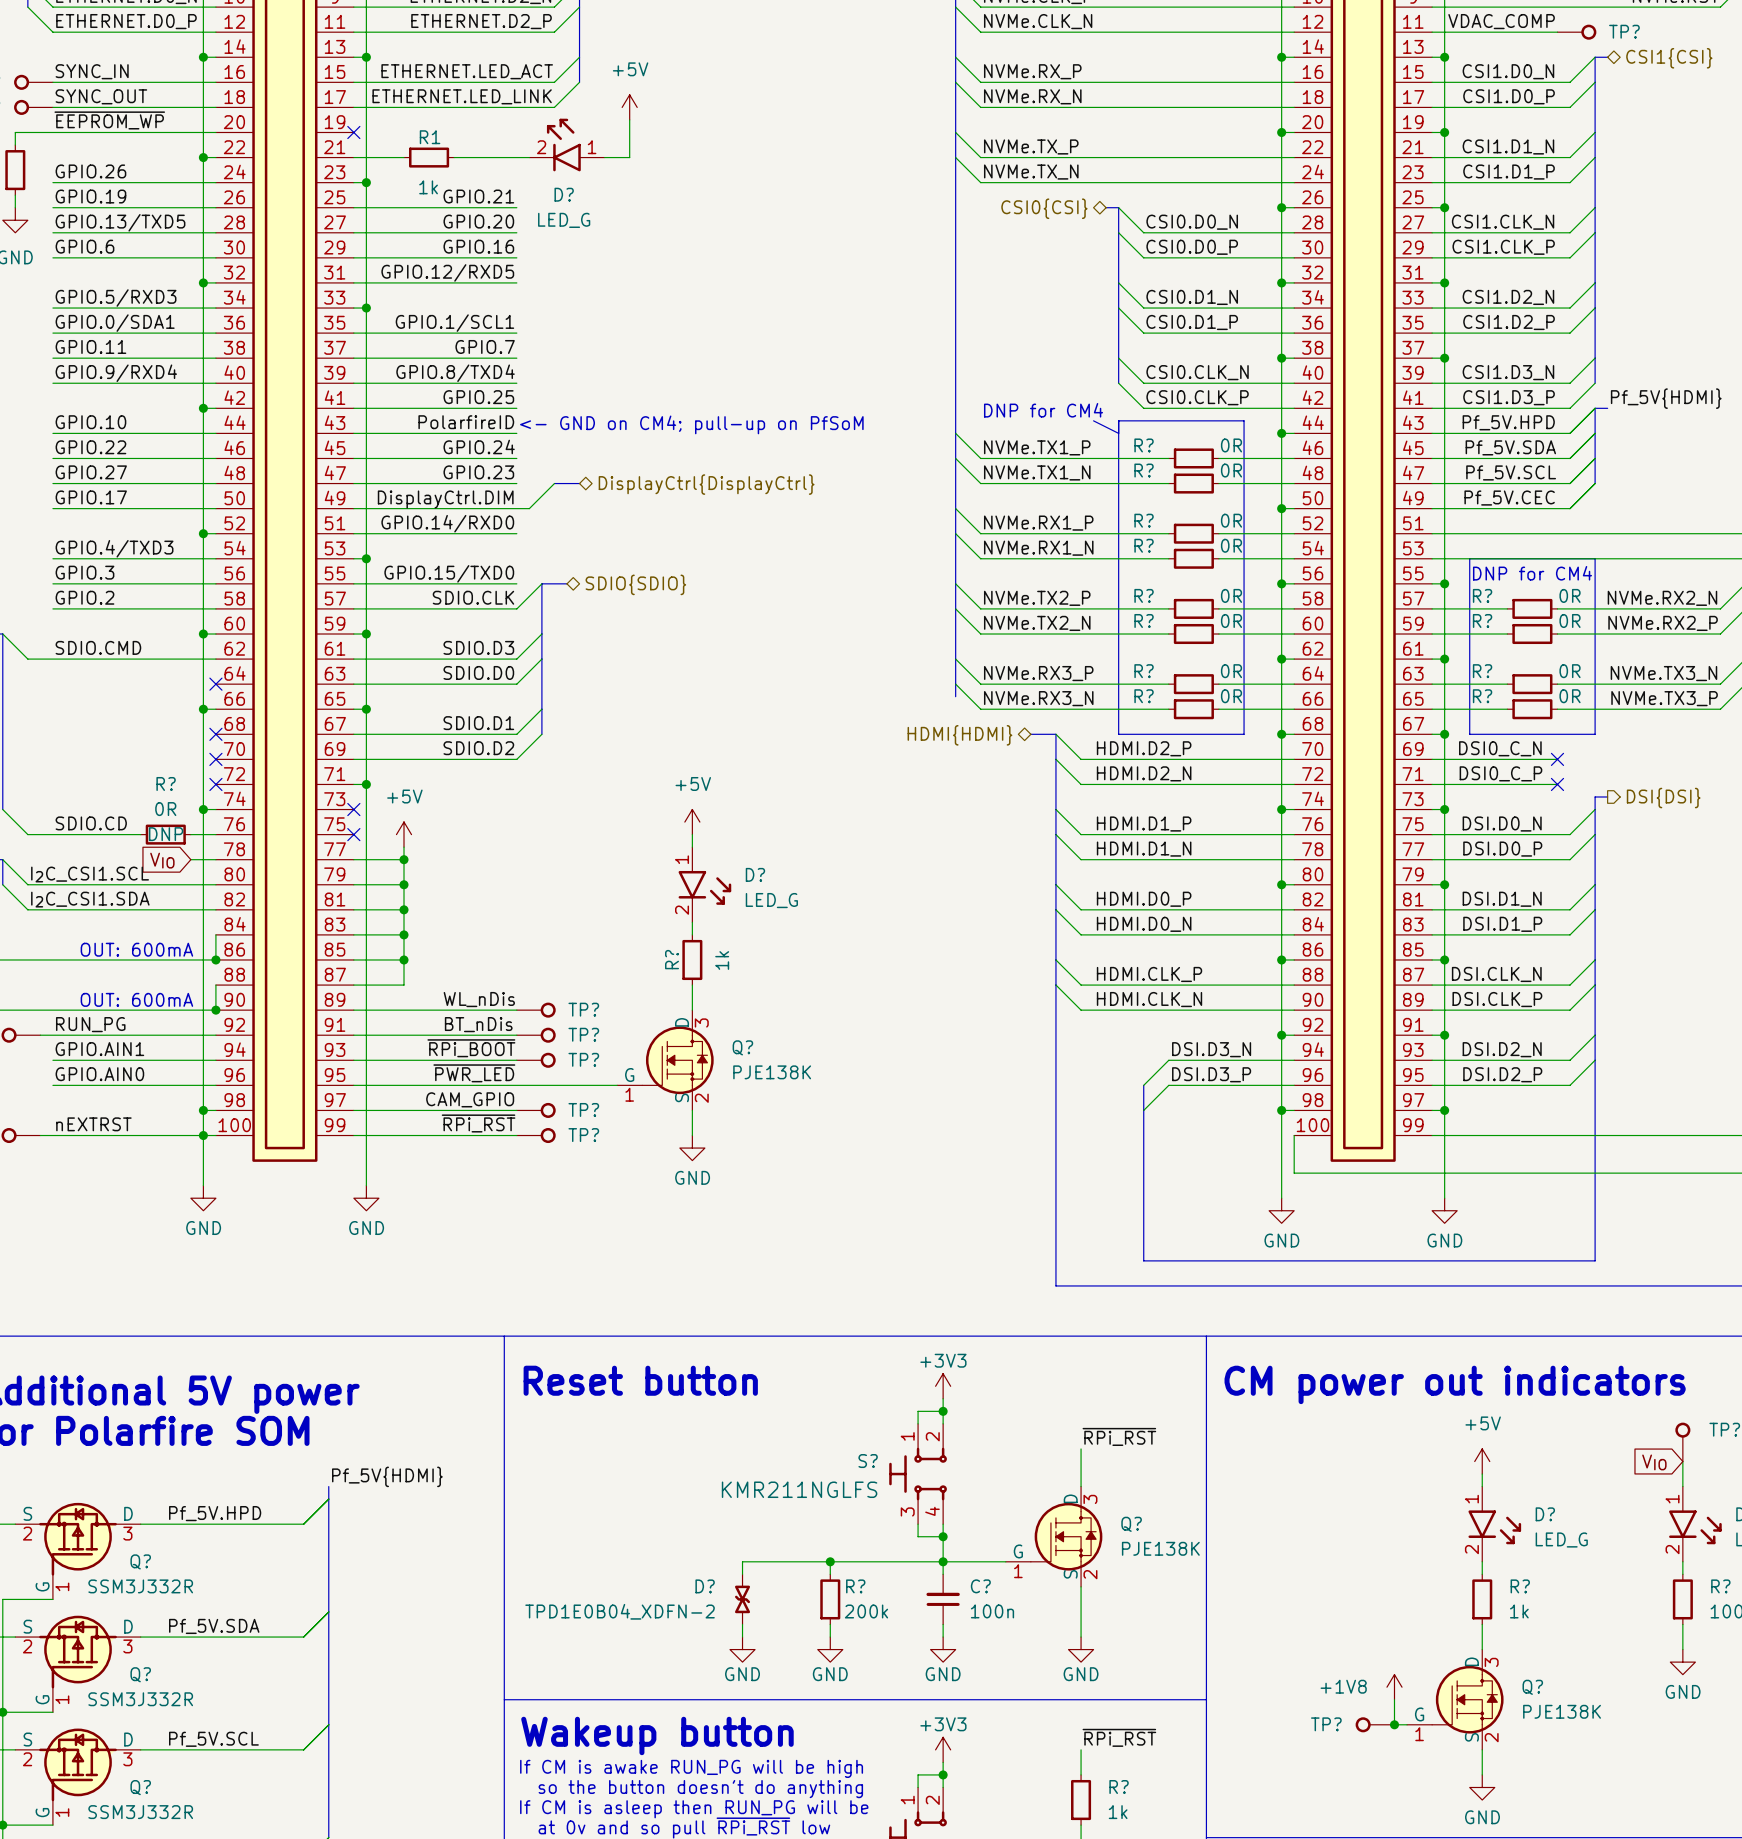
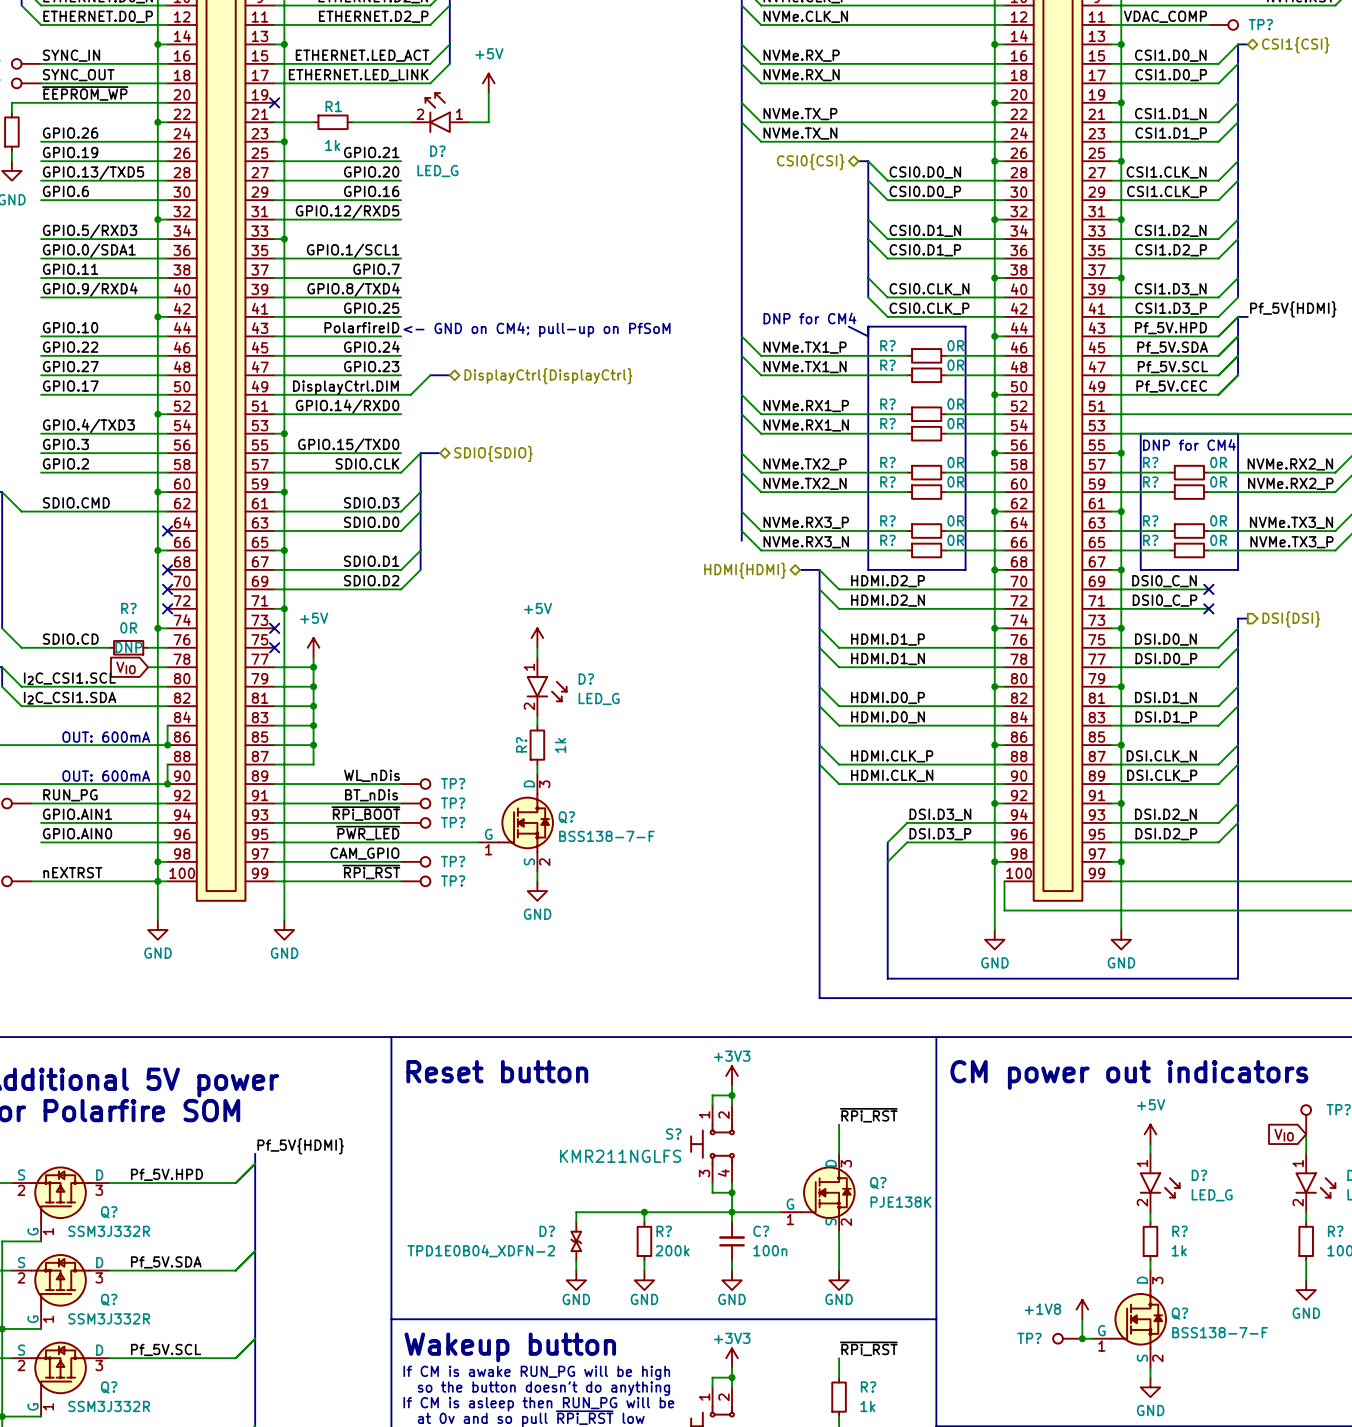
Q? symbol: [617, 1010, 714, 1111] -> [479, 774, 554, 872]
Q? value: PJE138K (772, 1072) -> BSS138-7-F (606, 836)
Q? symbol: [1407, 1649, 1504, 1750] -> [1092, 1270, 1168, 1368]
Q? value: PJE138K (1562, 1711) -> BSS138-7-F (1220, 1332)

